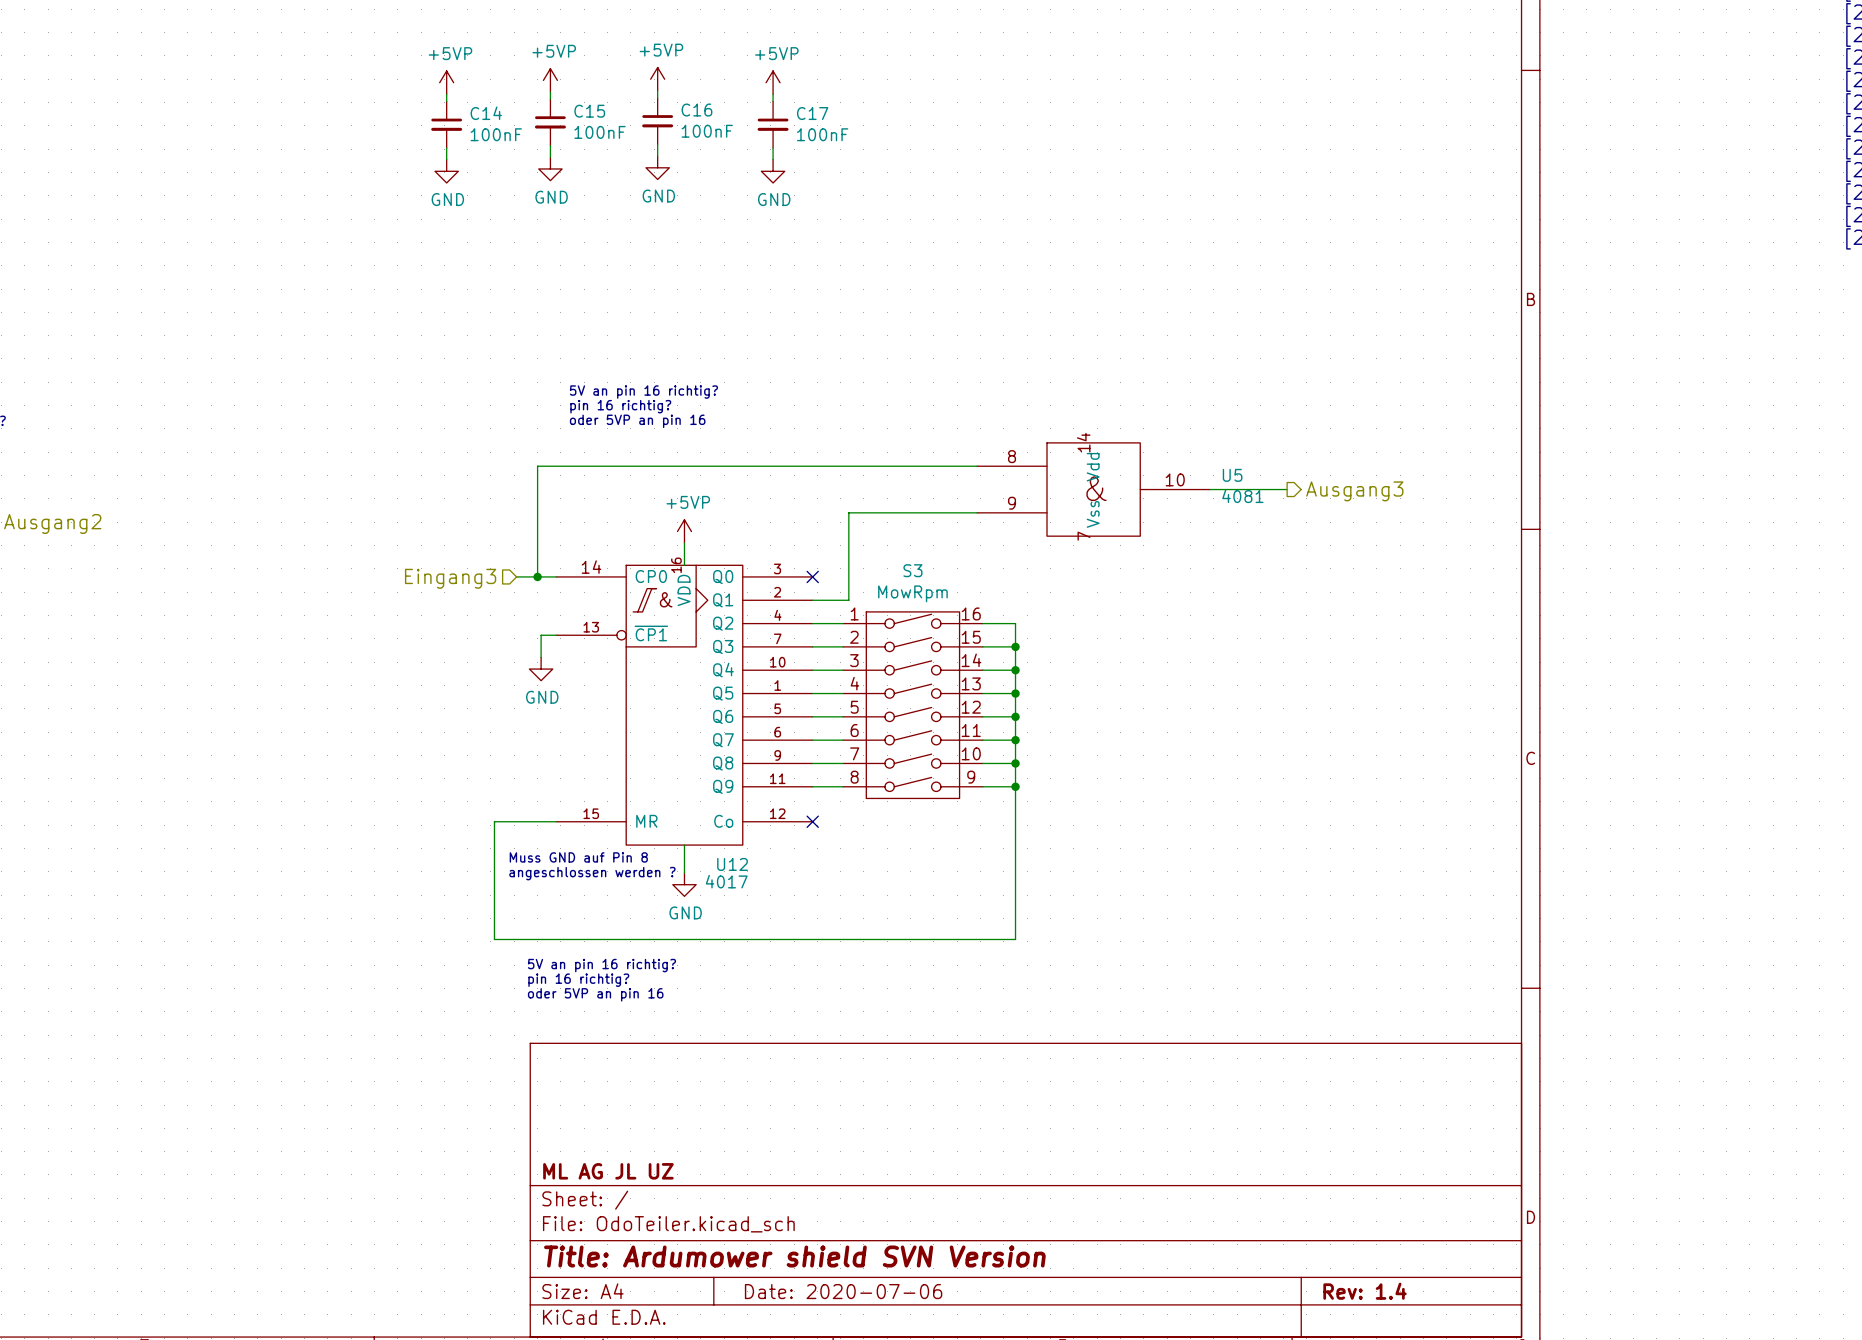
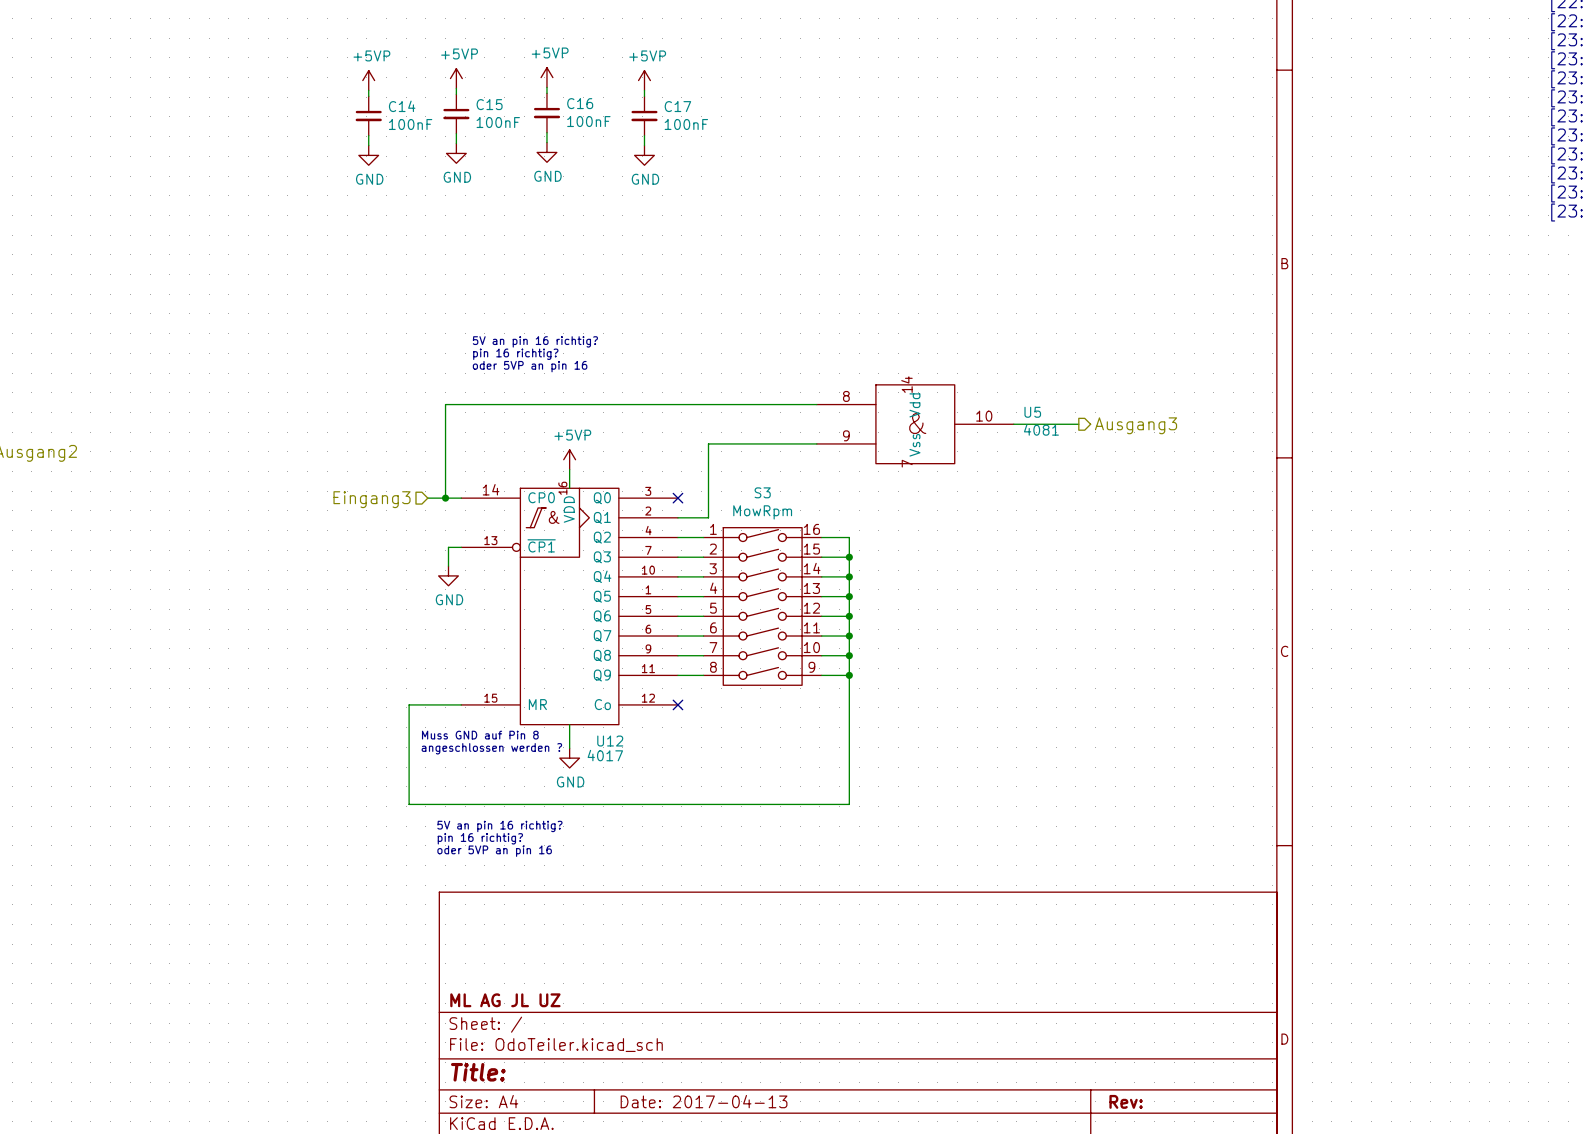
title block: Title: Ardumower shield SVN Version (794, 1256) -> Title: (478, 1072)
title block: Date: 2020-07-06 (843, 1291) -> Date: 2017-04-13 (704, 1101)
title block: Rev: 1.4 (1365, 1291) -> Rev: (1126, 1101)

